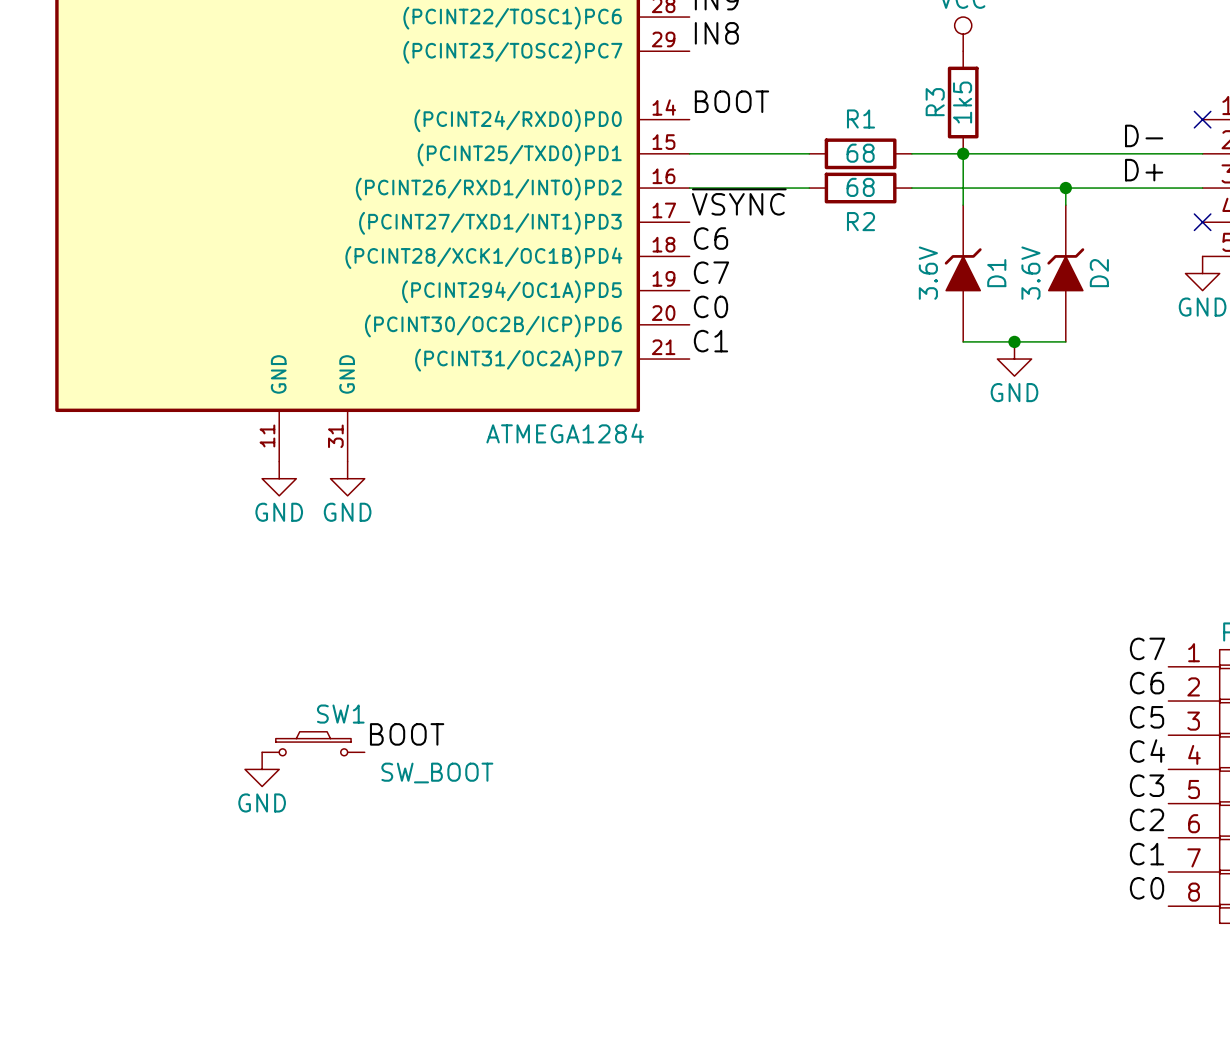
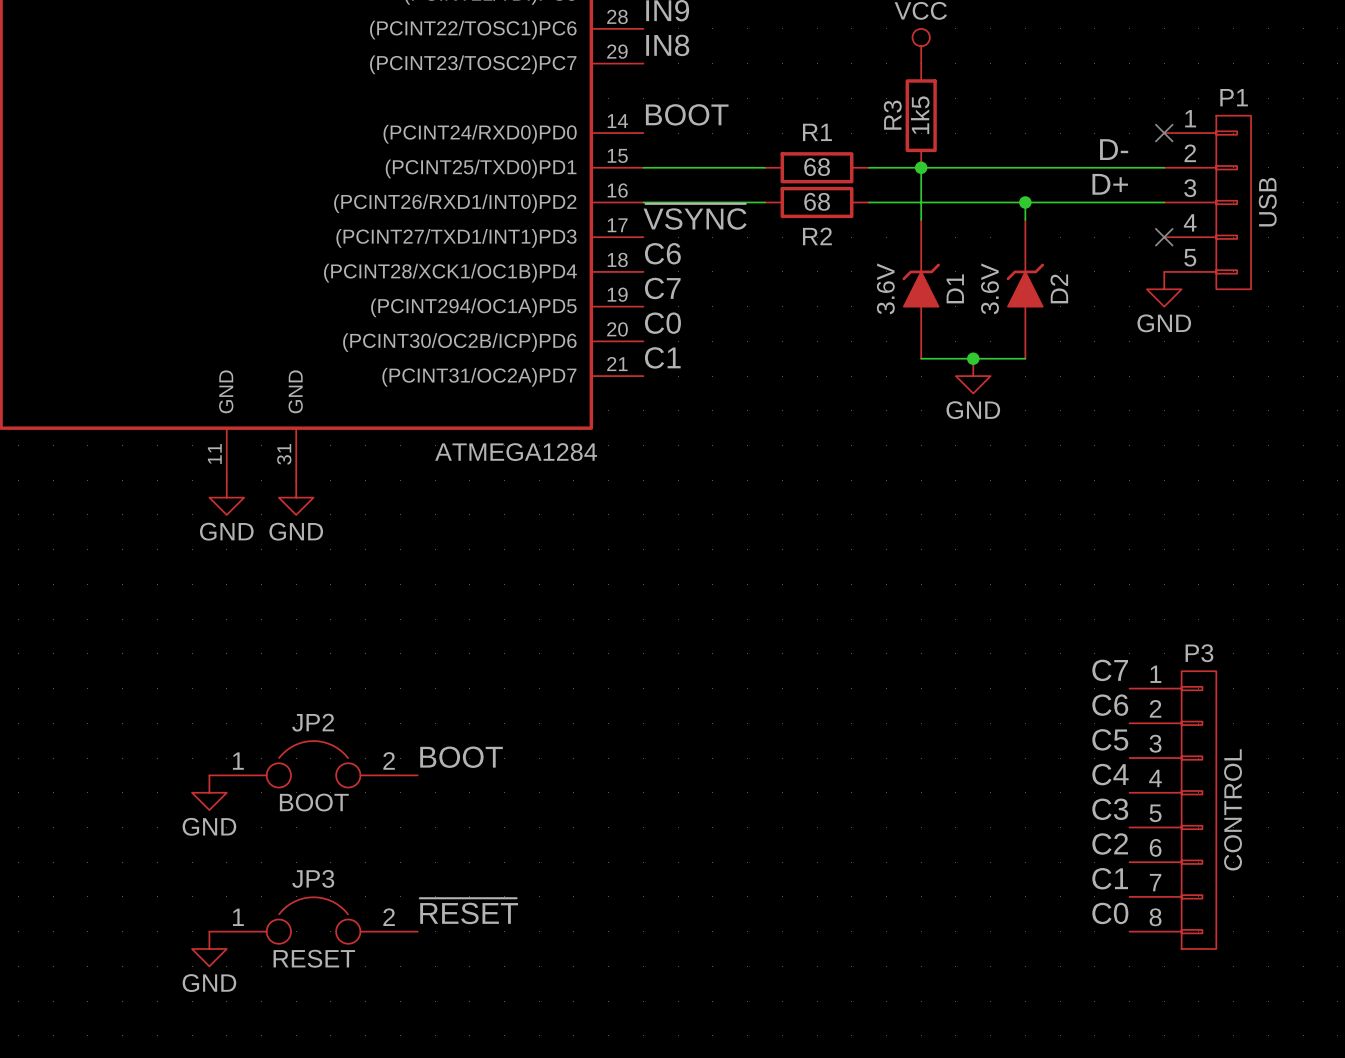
label position: BOOT (407, 734) -> BOOT (461, 757)
JP2: none -> BOOT (313, 764)
SW1: SW_BOOT (313, 743) -> none
label: none -> ~{RESET} (468, 911)
JP3: none -> RESET (313, 920)
power symbol: none -> GND (209, 948)

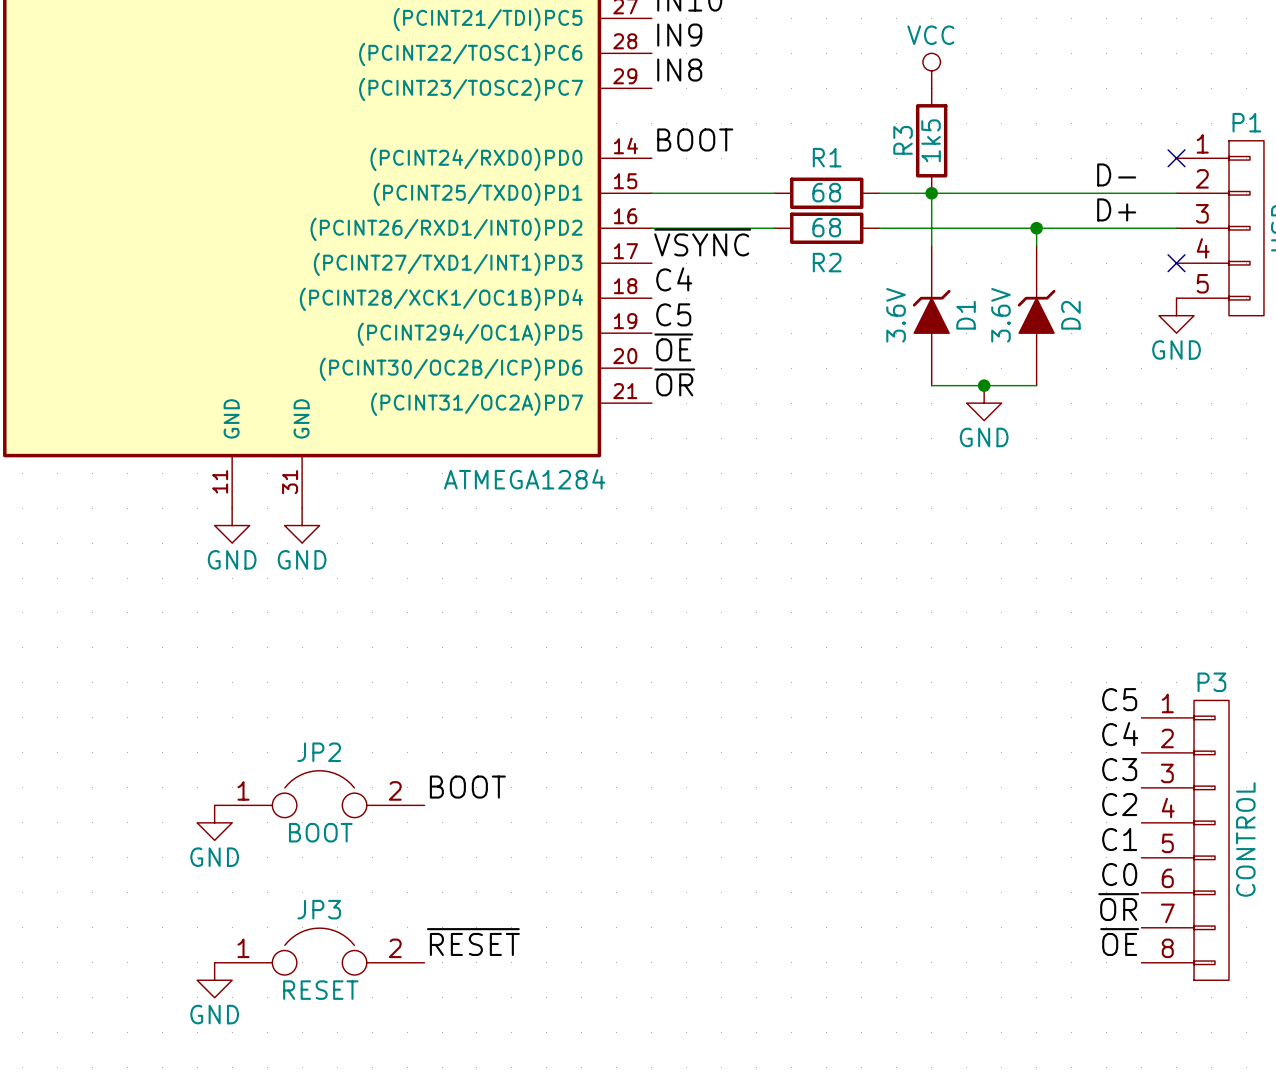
label: C6 (662, 253) -> C4 (674, 279)
label: C7 (662, 288) -> C5 (673, 314)
label: C0 (662, 323) -> ~{OE} (673, 347)
label: C1 (662, 357) -> ~{OR} (674, 382)
label: C7 (1110, 670) -> C5 (1119, 699)
label: C6 (1110, 705) -> C4 (1120, 734)
label: C5 (1110, 739) -> C3 (1119, 769)
label: C4 (1110, 774) -> C2 (1119, 804)
label: C3 (1110, 809) -> C1 (1119, 839)
label: C2 (1110, 844) -> C0 (1119, 874)
label: C1 (1110, 878) -> ~{OR} (1118, 907)
label: C0 (1110, 913) -> ~{OE} (1119, 942)

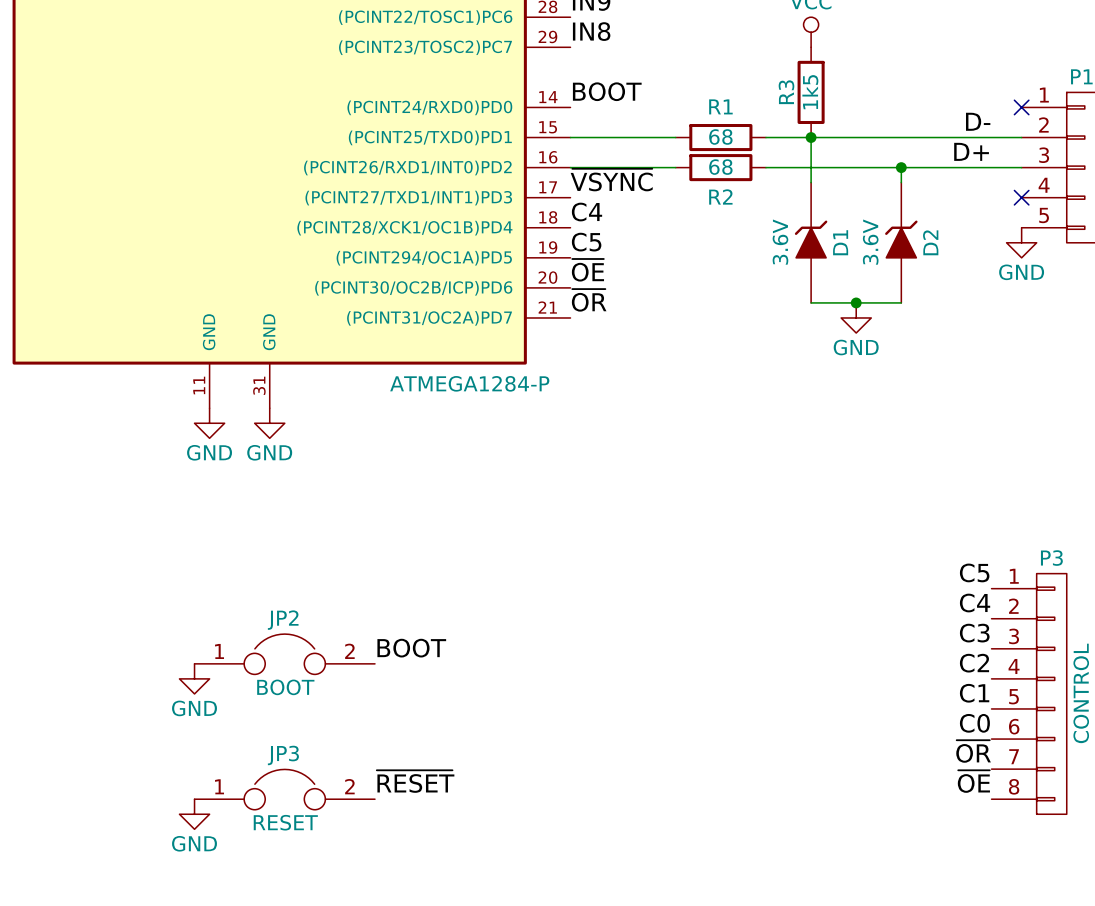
part value: ATMEGA1284 (524, 479) -> ATMEGA1284-P (469, 383)

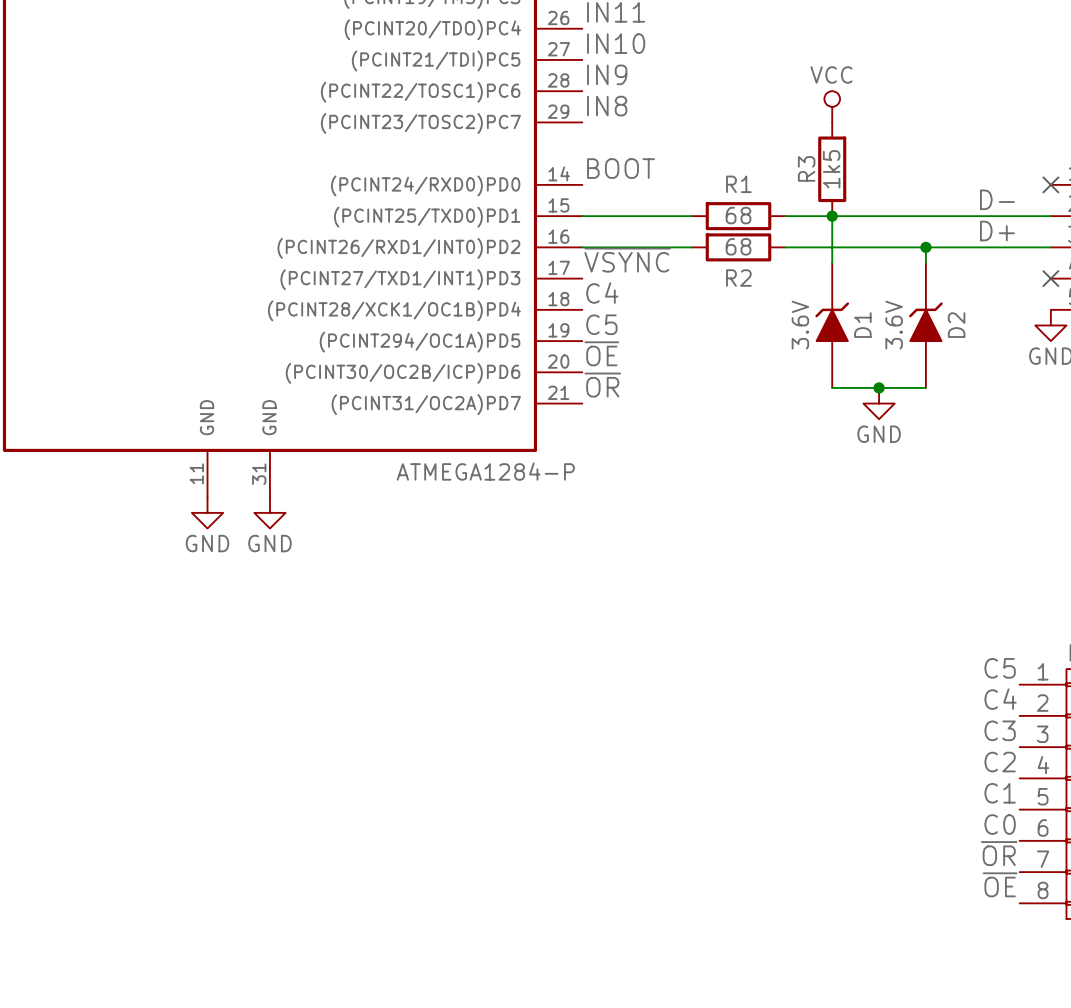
label: BOOT (411, 648) -> none
JP2: BOOT (284, 654) -> none
power symbol: GND (194, 678) -> none
label: ~{RESET} (415, 781) -> none
JP3: RESET (284, 789) -> none
power symbol: GND (194, 814) -> none

